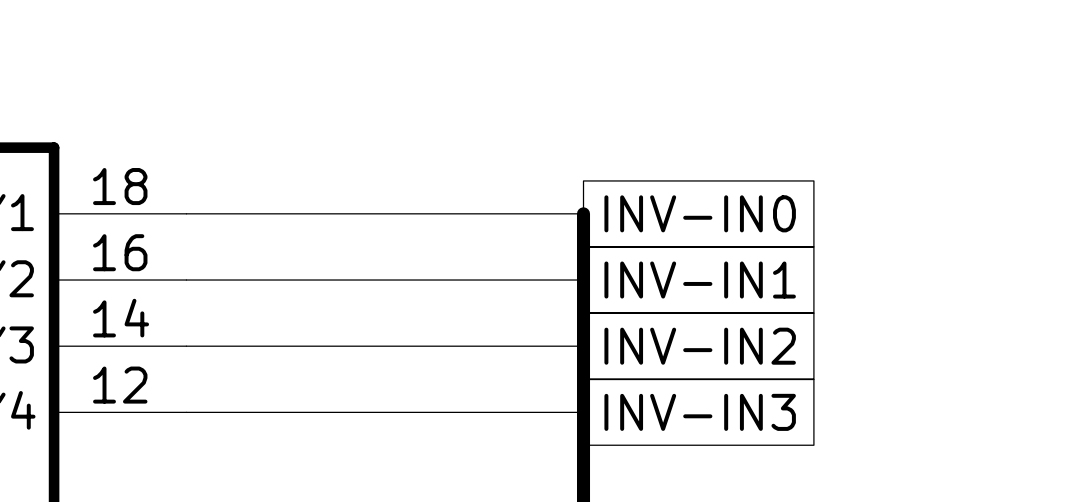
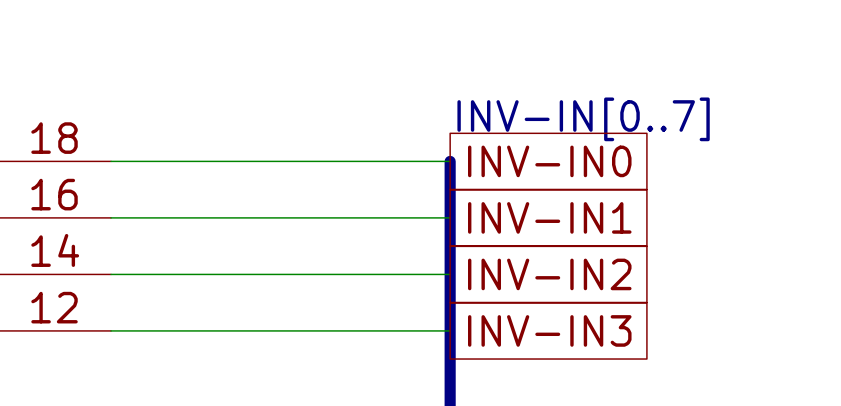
text: none -> INV-IN[0..7] (583, 119)

